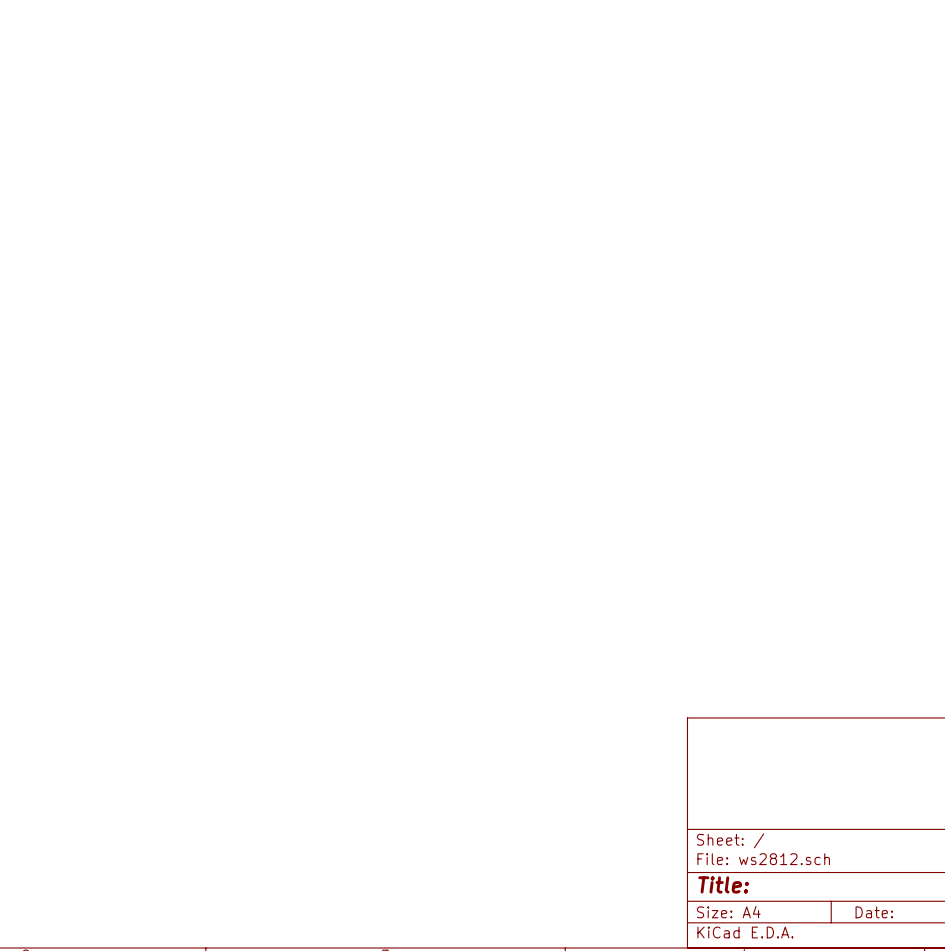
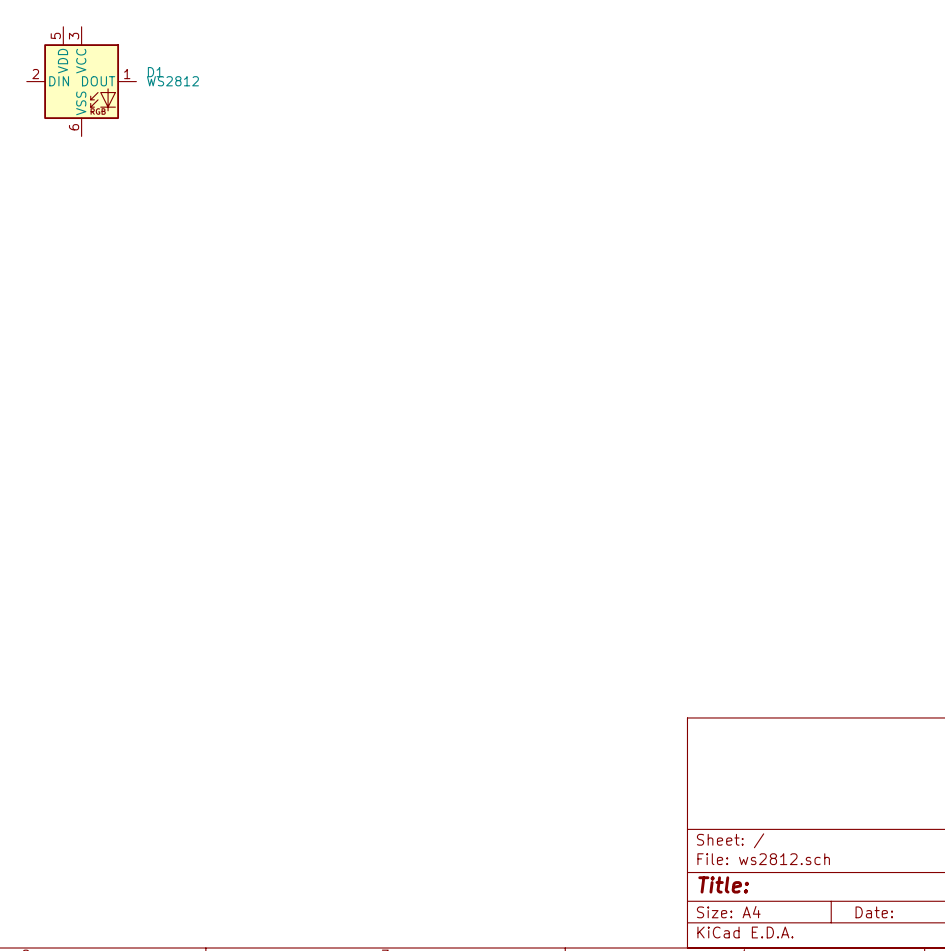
D1: none -> WS2812 (81, 81)

